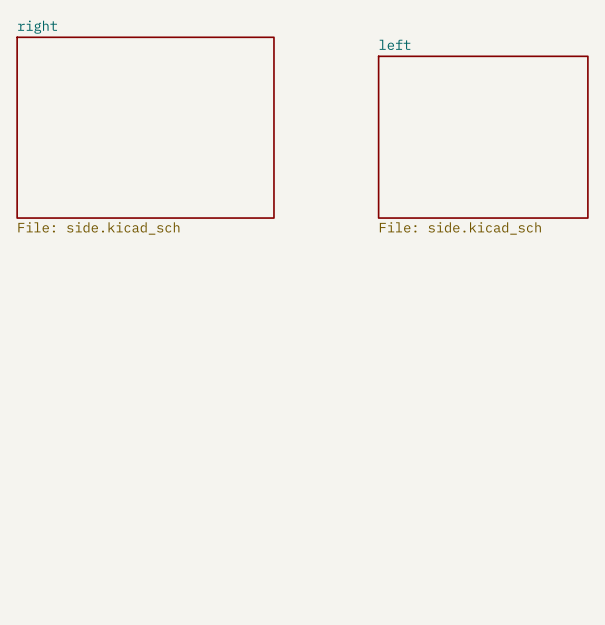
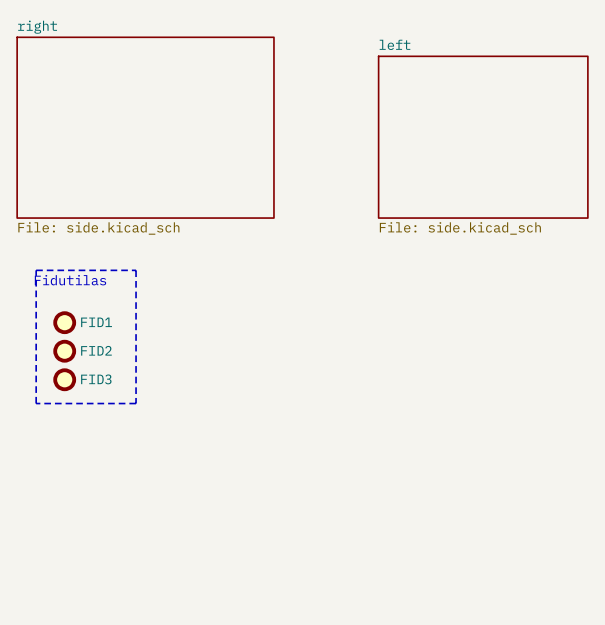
line: none -> (36, 270) (136, 270) (136, 403) (36, 403) (36, 270)
text: none -> Fidutilas (70, 280)
FID1: none -> (64, 322)
FID2: none -> (64, 351)
FID3: none -> (64, 379)

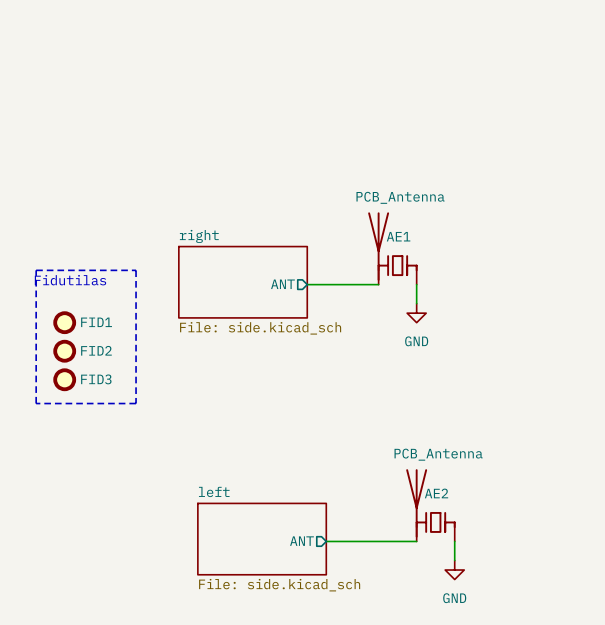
sheet right: File: side.kicad_sch (145, 127) -> none
sheet left: File: side.kicad_sch (483, 137) -> none
AE1: none -> PCB_Antenna (392, 248)
sheet right: none -> File: side.kicad_sch (243, 282)
sheet pin: none -> ANT (282, 284)
wire: none -> (307, 284) (378, 284)
wire: none -> (416, 284) (416, 303)
power symbol: none -> GND (416, 313)
AE2: none -> PCB_Antenna (430, 505)
sheet left: none -> File: side.kicad_sch (262, 539)
sheet pin: none -> ANT (301, 541)
wire: none -> (326, 541) (416, 541)
wire: none -> (454, 541) (454, 560)
power symbol: none -> GND (454, 570)

